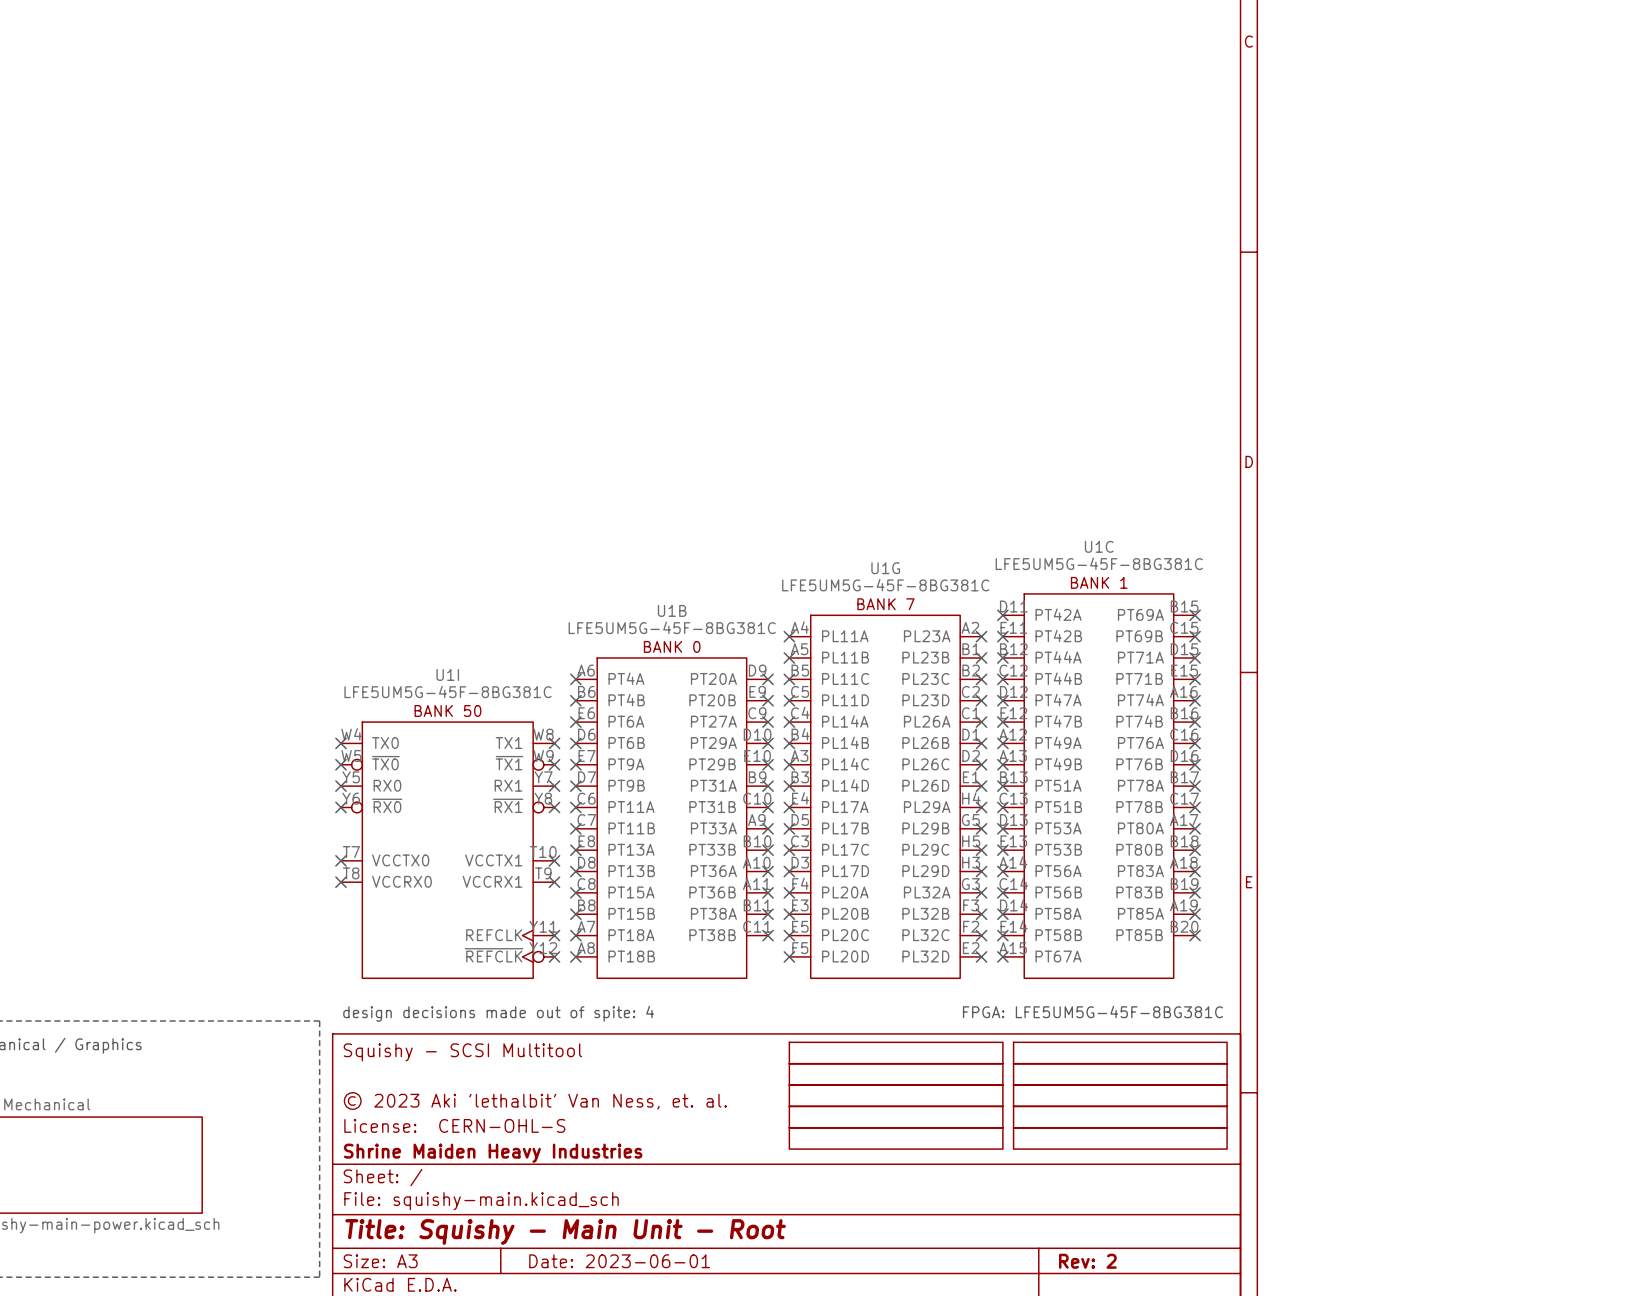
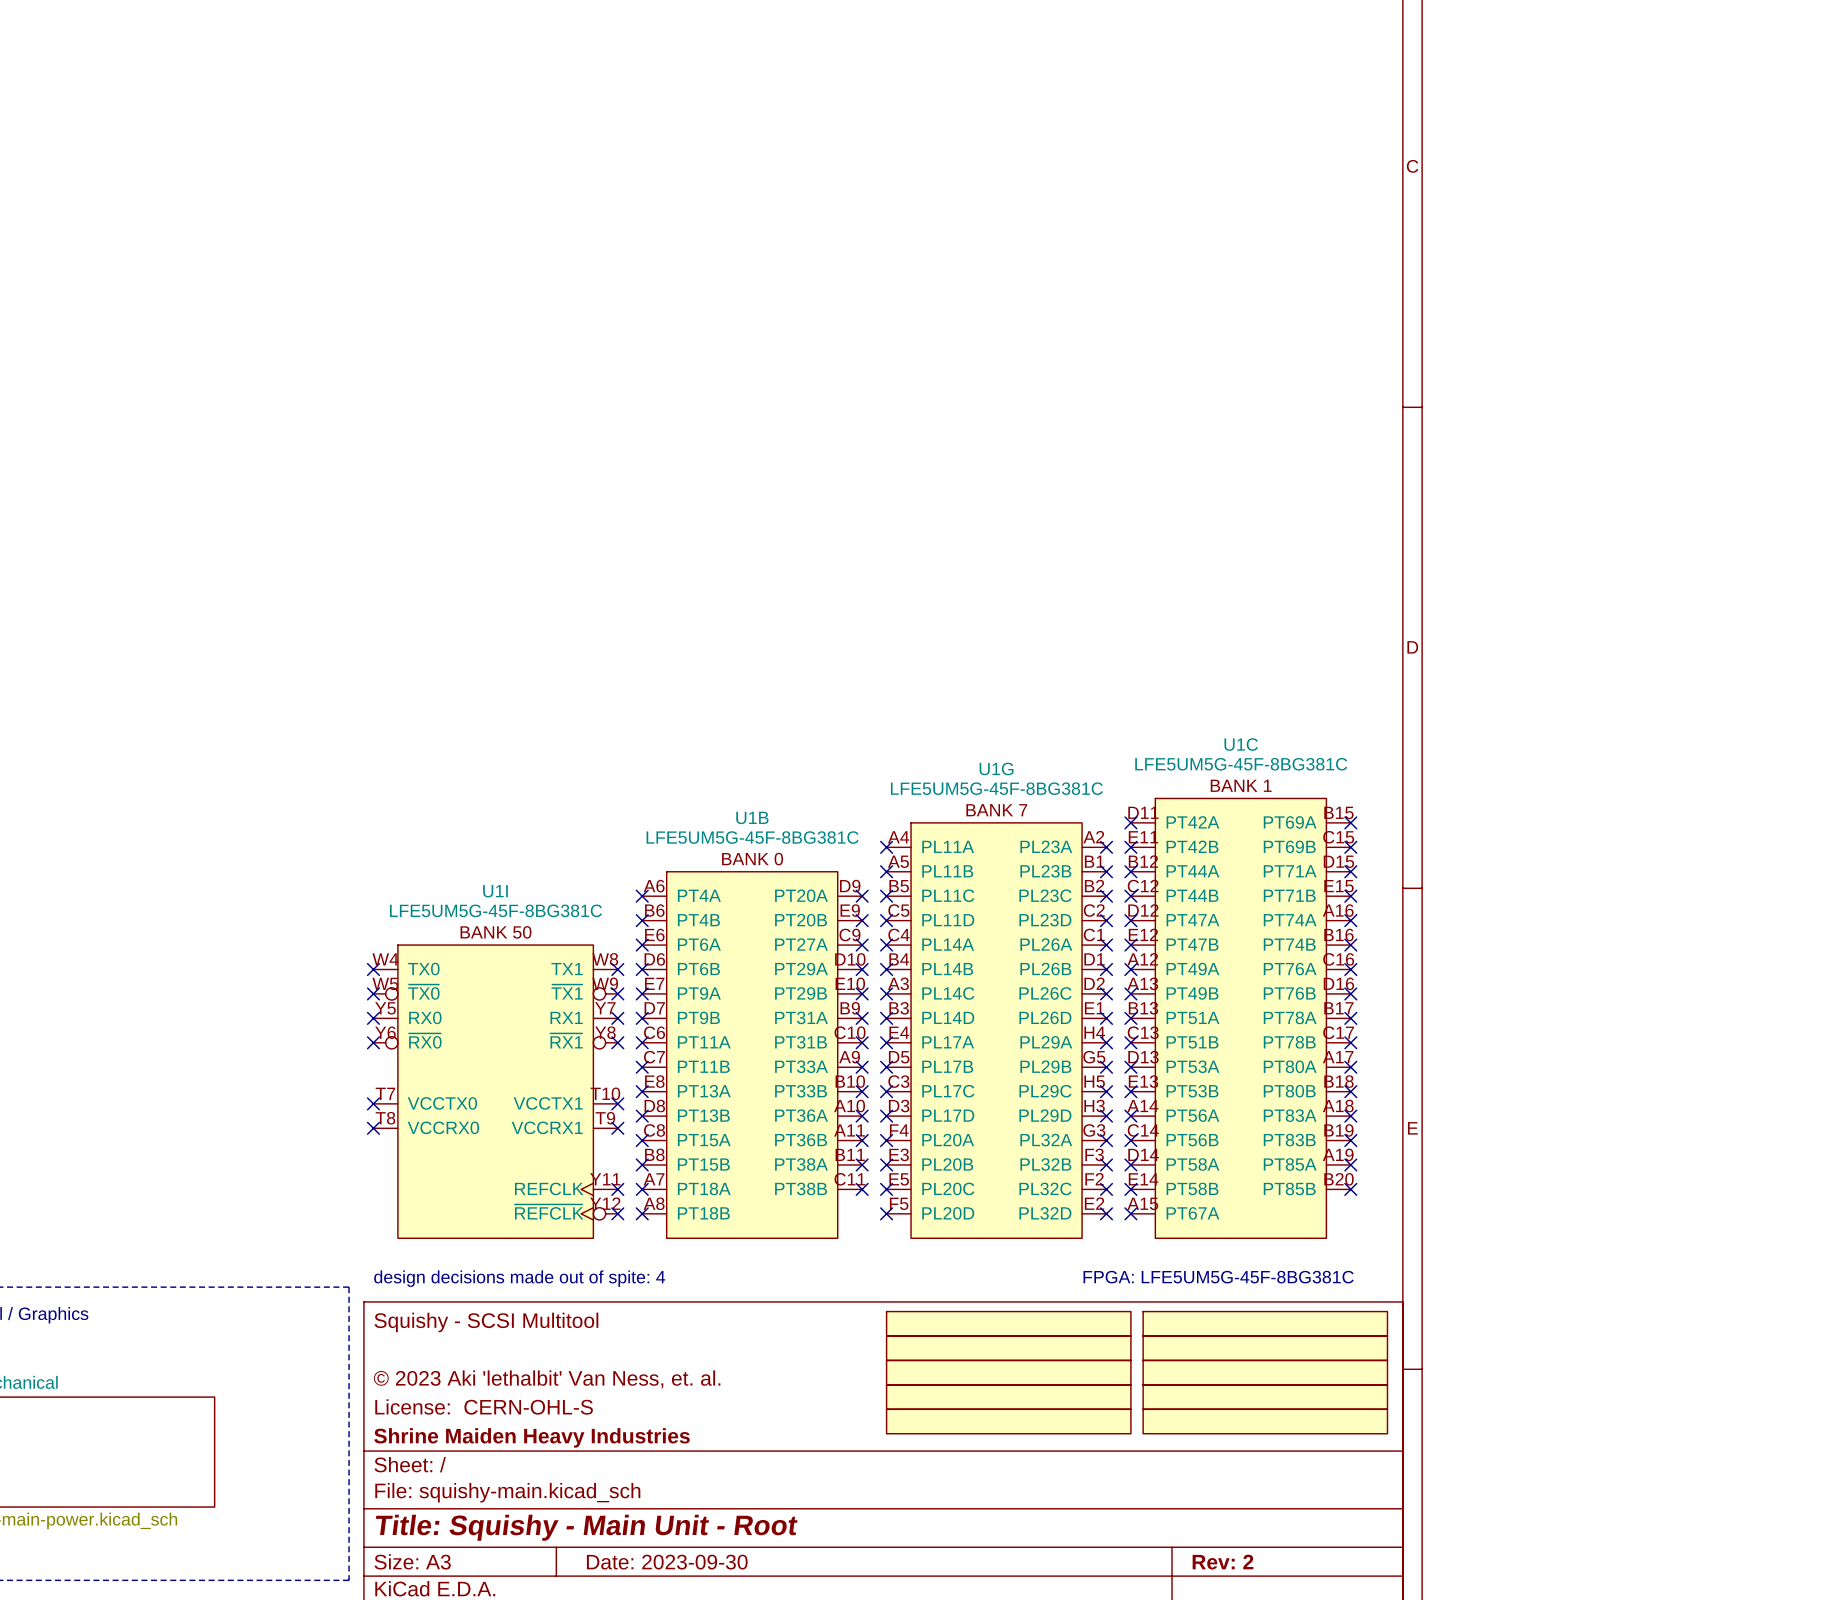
title block: Date: 2023-06-01 (619, 1261) -> Date: 2023-09-30 (667, 1562)

